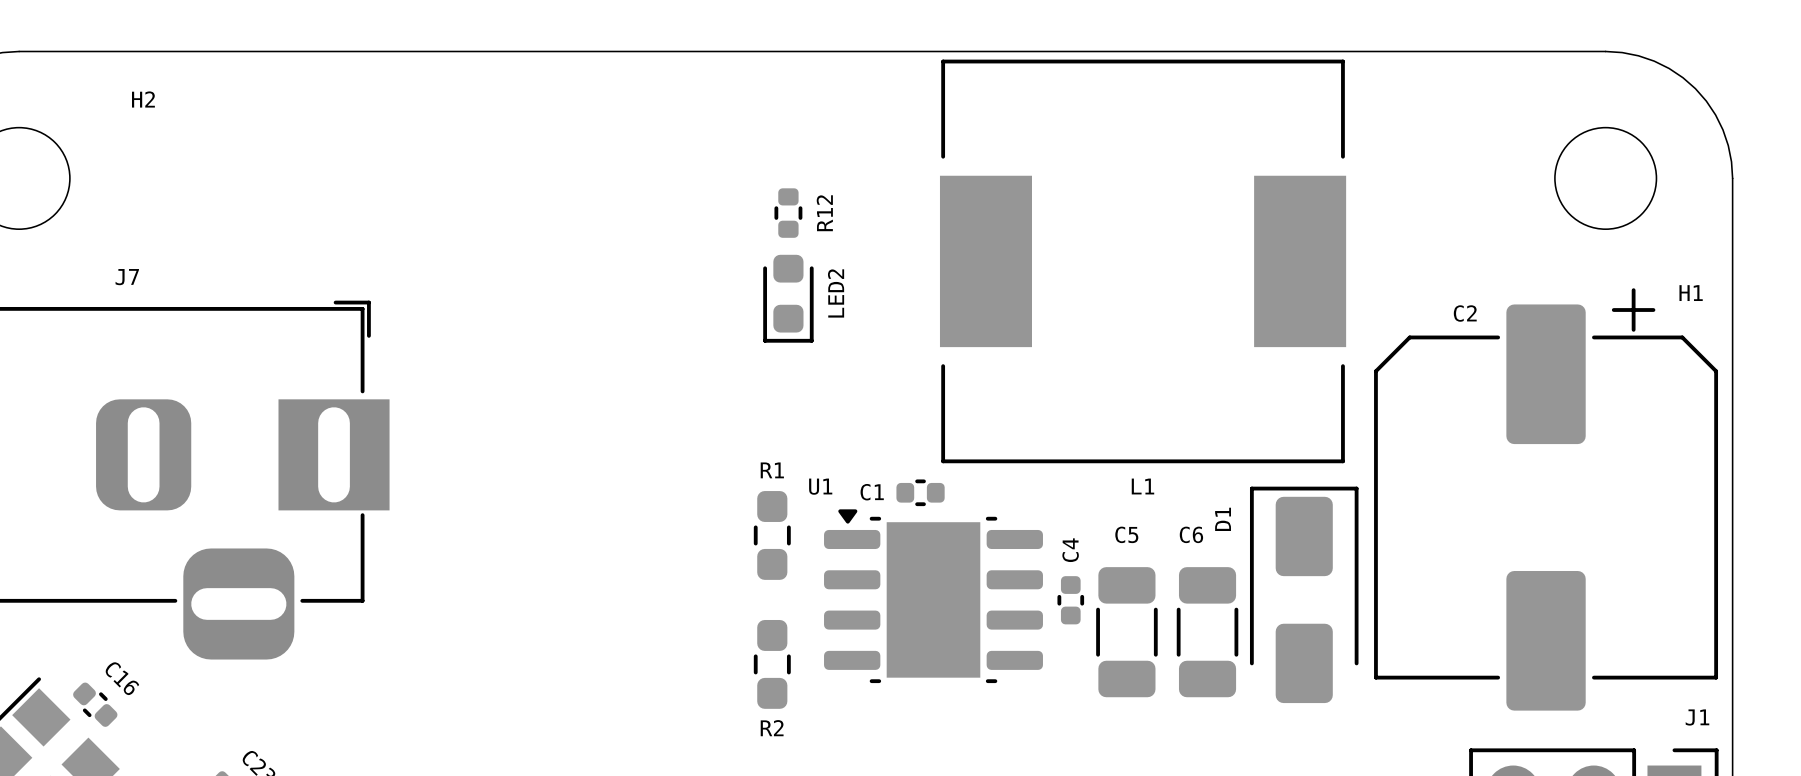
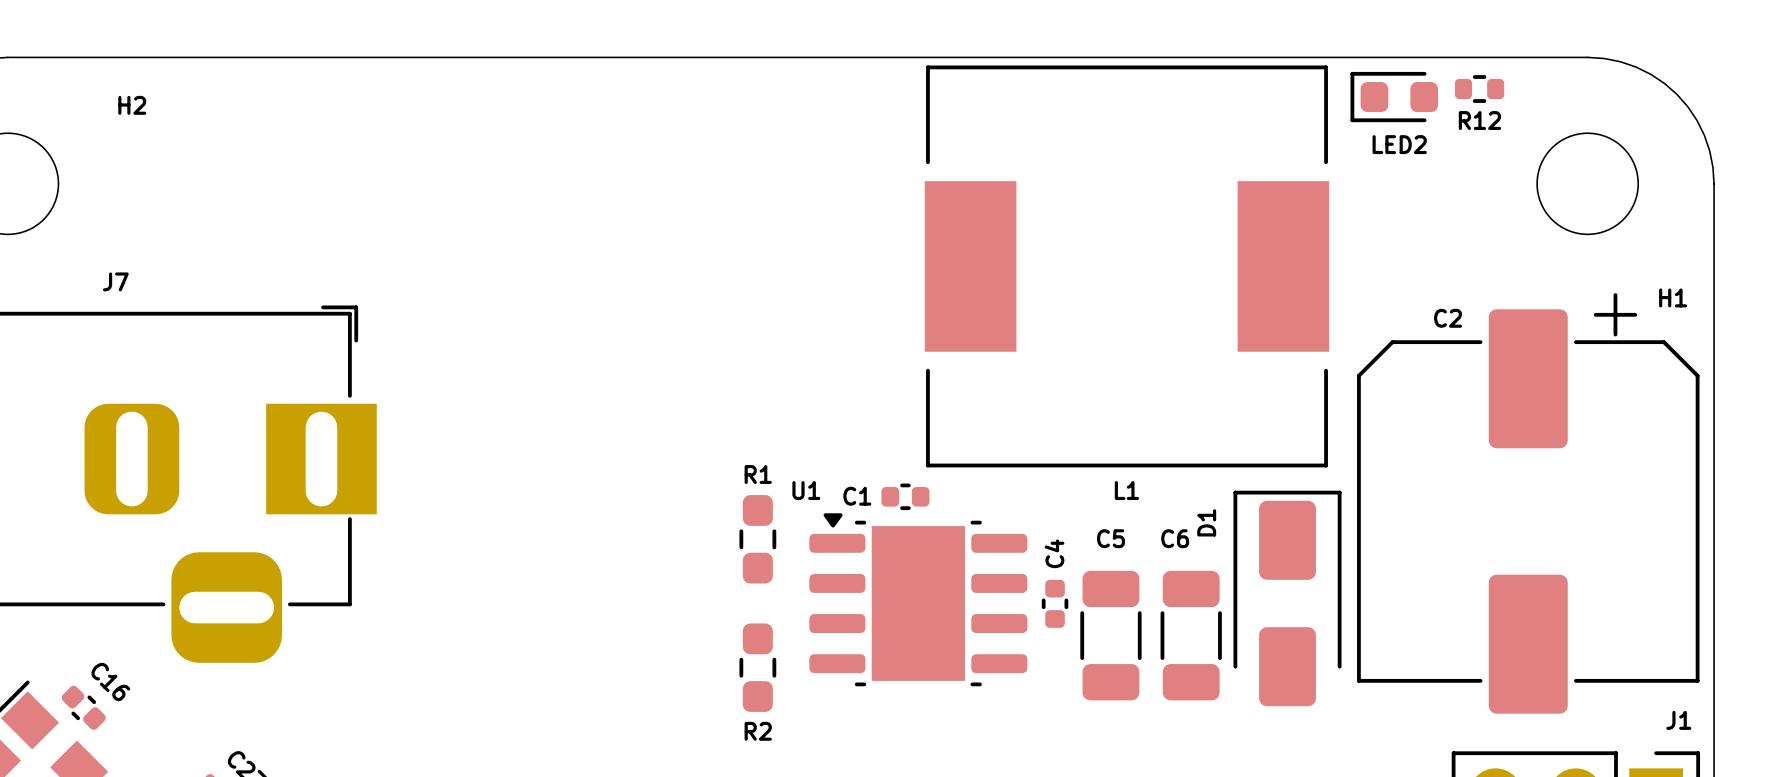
R12 rotation: 0° (788, 213) -> 90° clockwise (1479, 89)
R12 position: (788, 213) -> (1479, 89)
LED2 rotation: 0° (788, 298) -> 90° clockwise (1394, 97)
LED2 position: (788, 298) -> (1394, 97)

